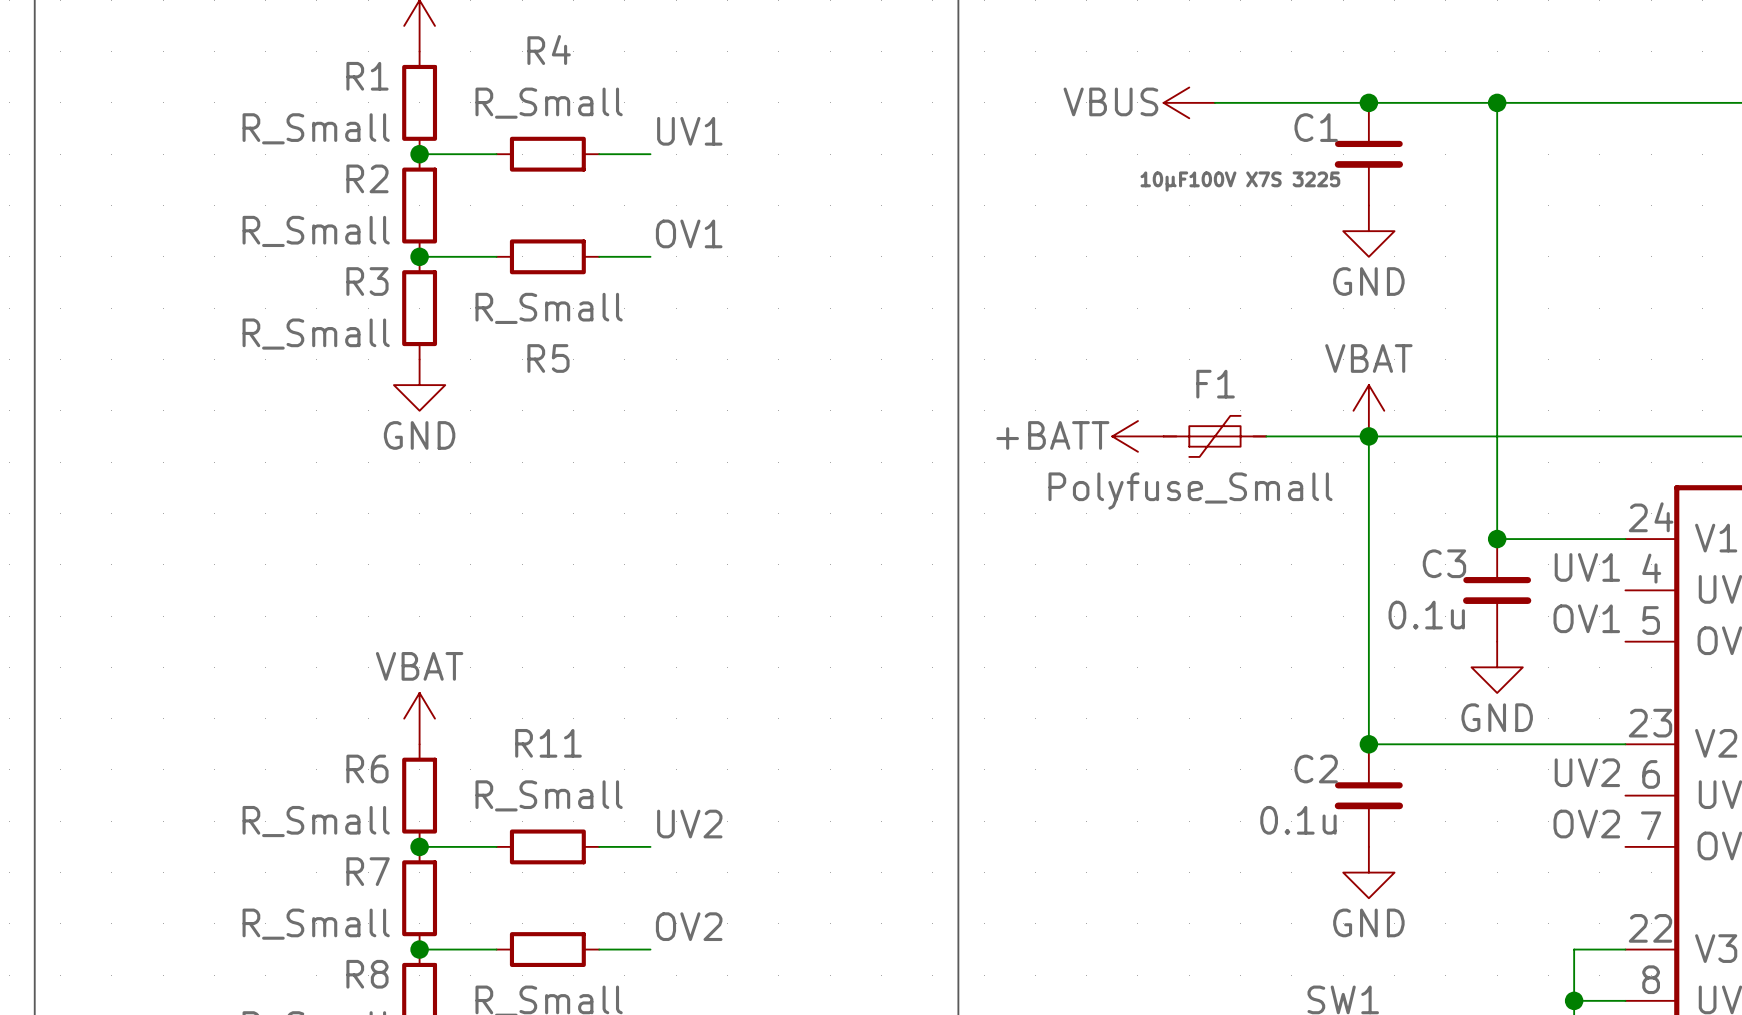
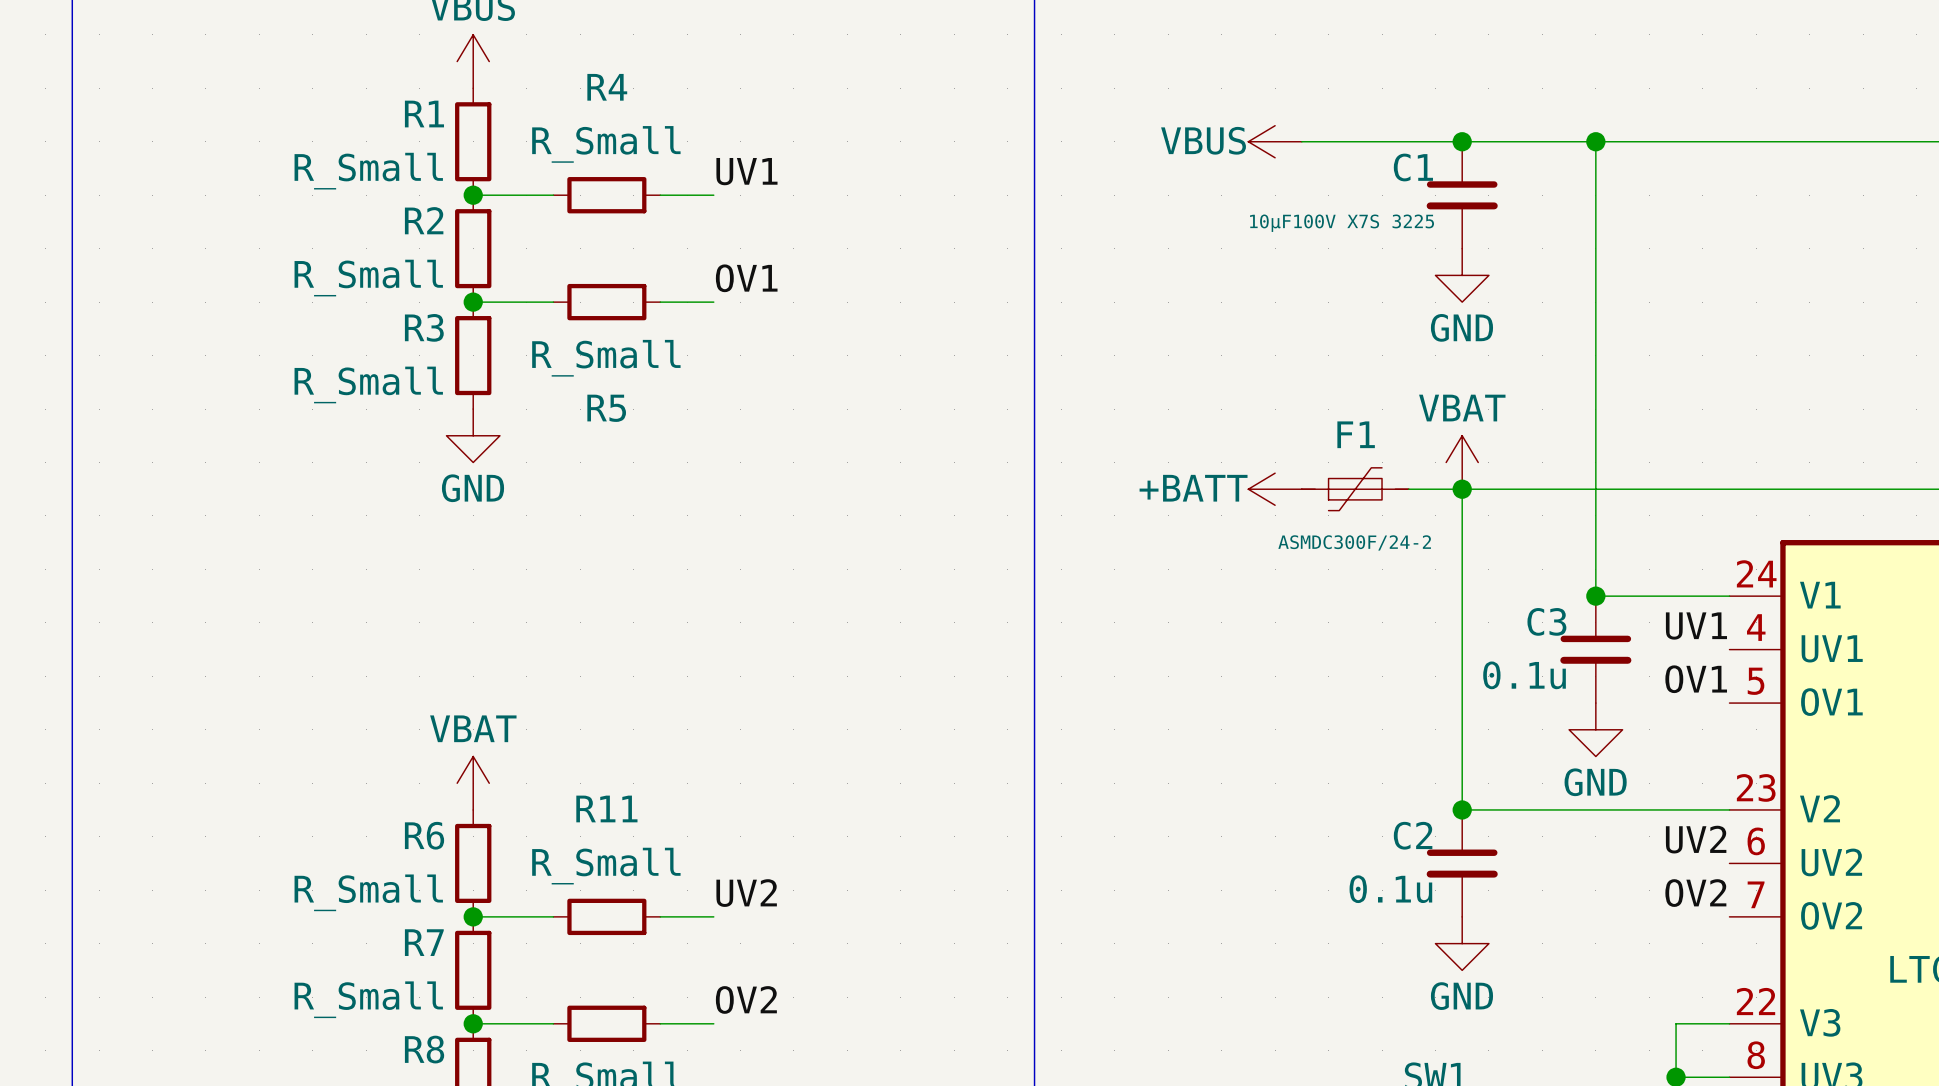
power symbol position: +BATT (1137, 436) -> +BATT (1275, 489)
F1 position: (1214, 436) -> (1355, 489)
F1 value: Polyfuse_Small (1190, 491) -> ASMDC300F/24-2 (1354, 542)

